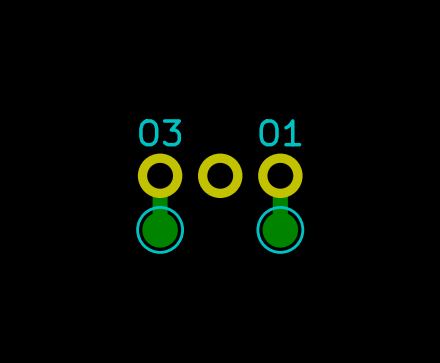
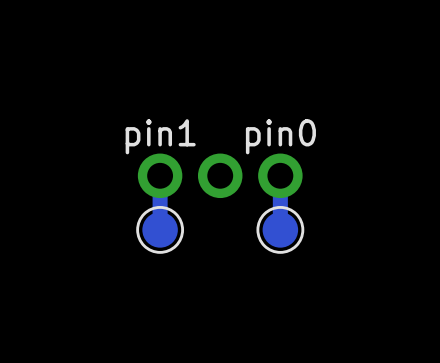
O3 name: O3 (160, 132) -> none
O1 name: O1 (280, 132) -> none
text: none -> pin1 (160, 136)
text: none -> pin0 (280, 136)

